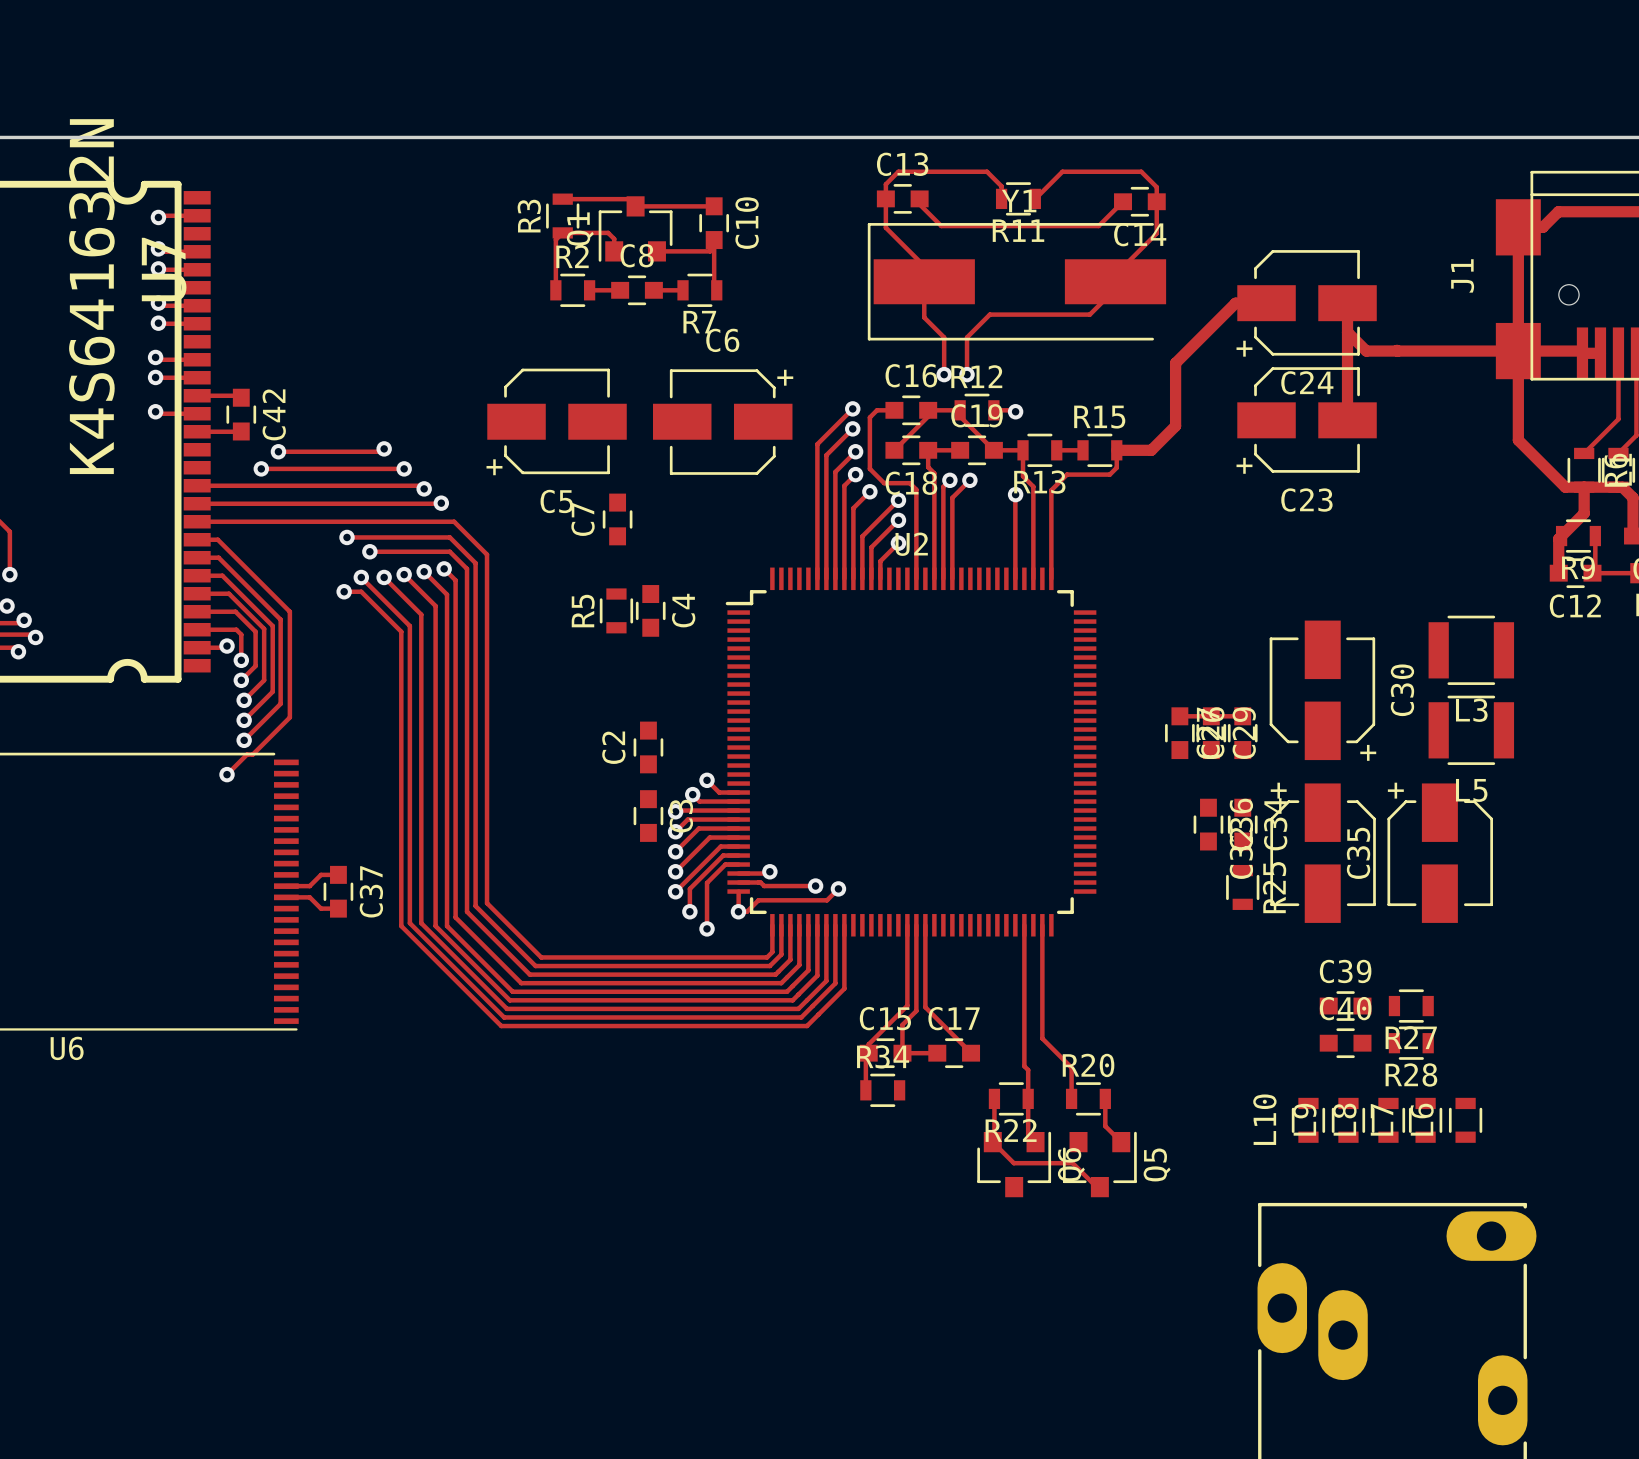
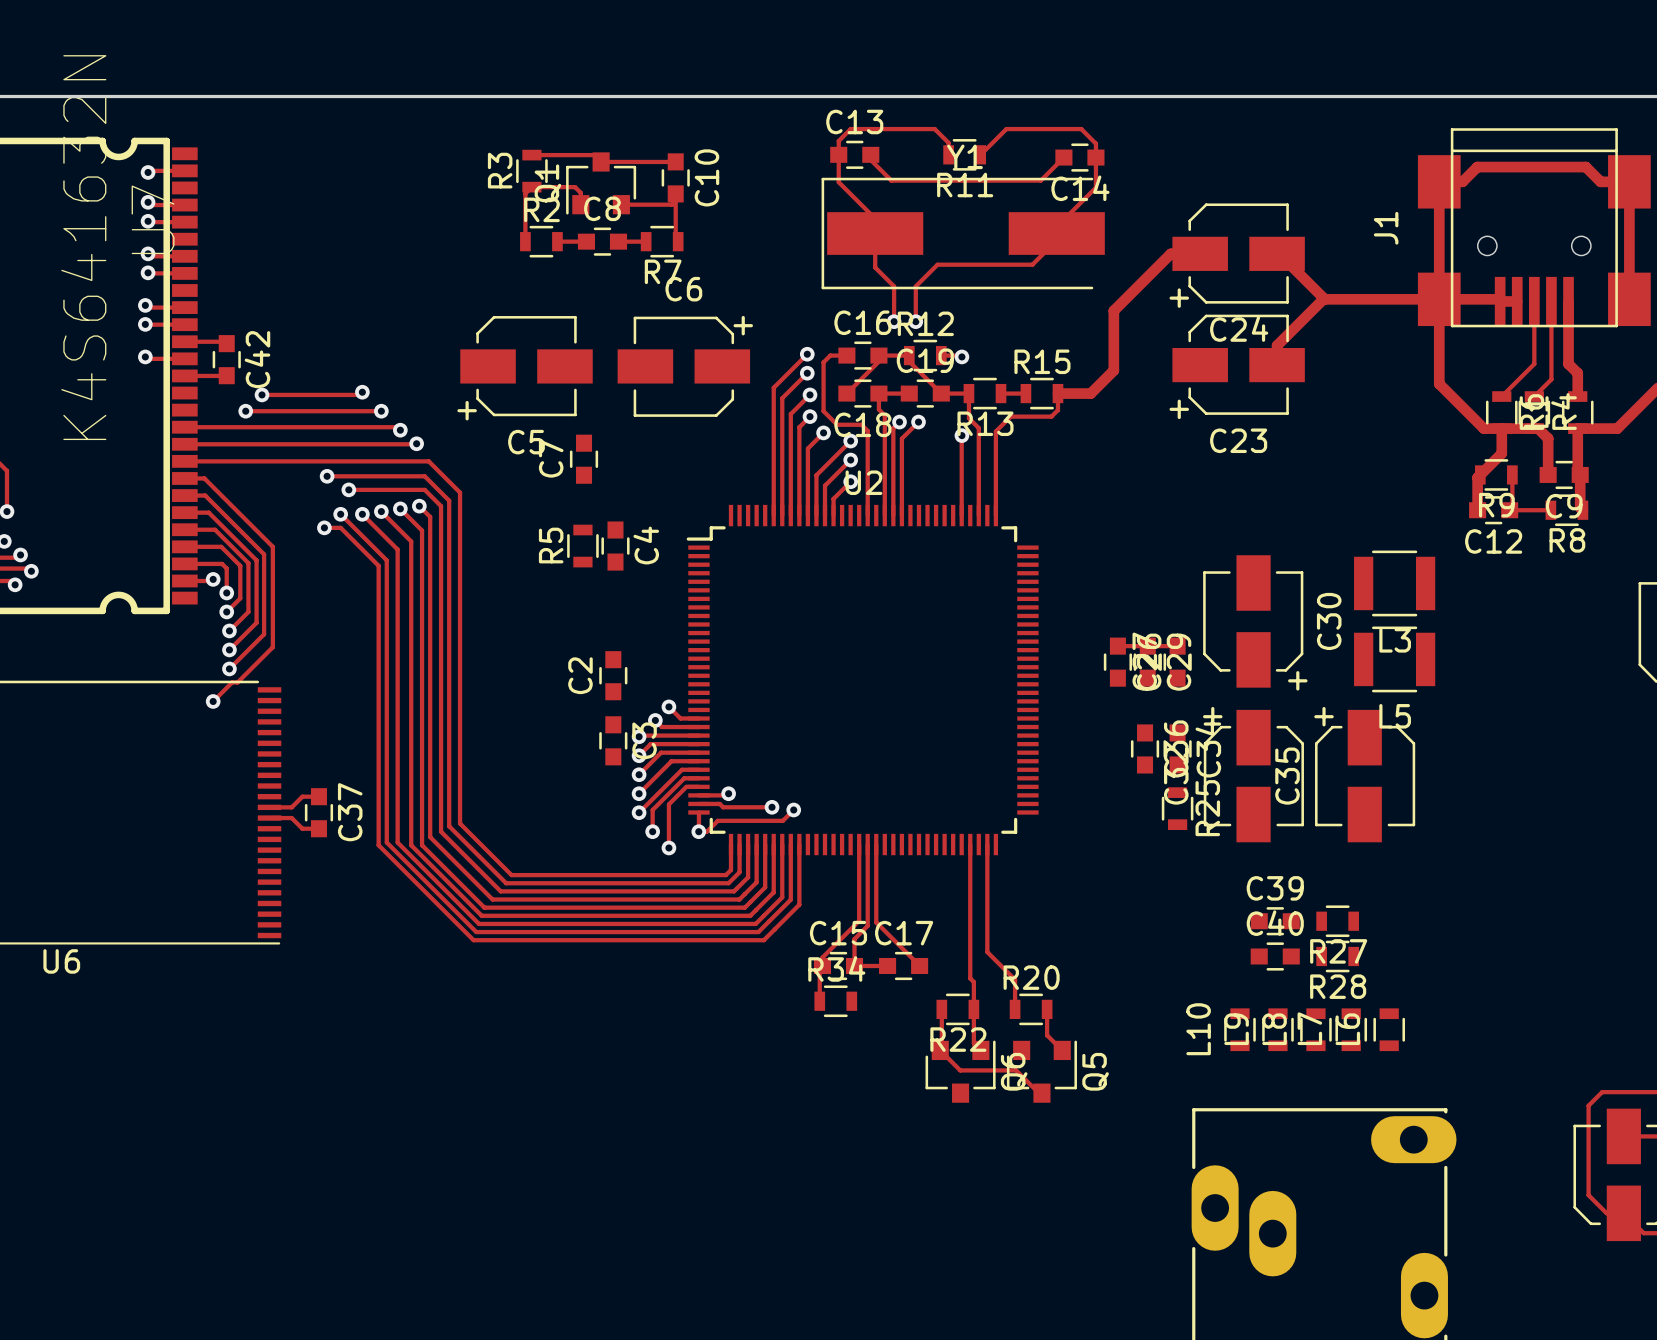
track: (1347, 303) (1347, 399) -> (1279, 253) (1324, 298) (1277, 345)
track: (1347, 332) (1366, 351) (1397, 351) -> none

